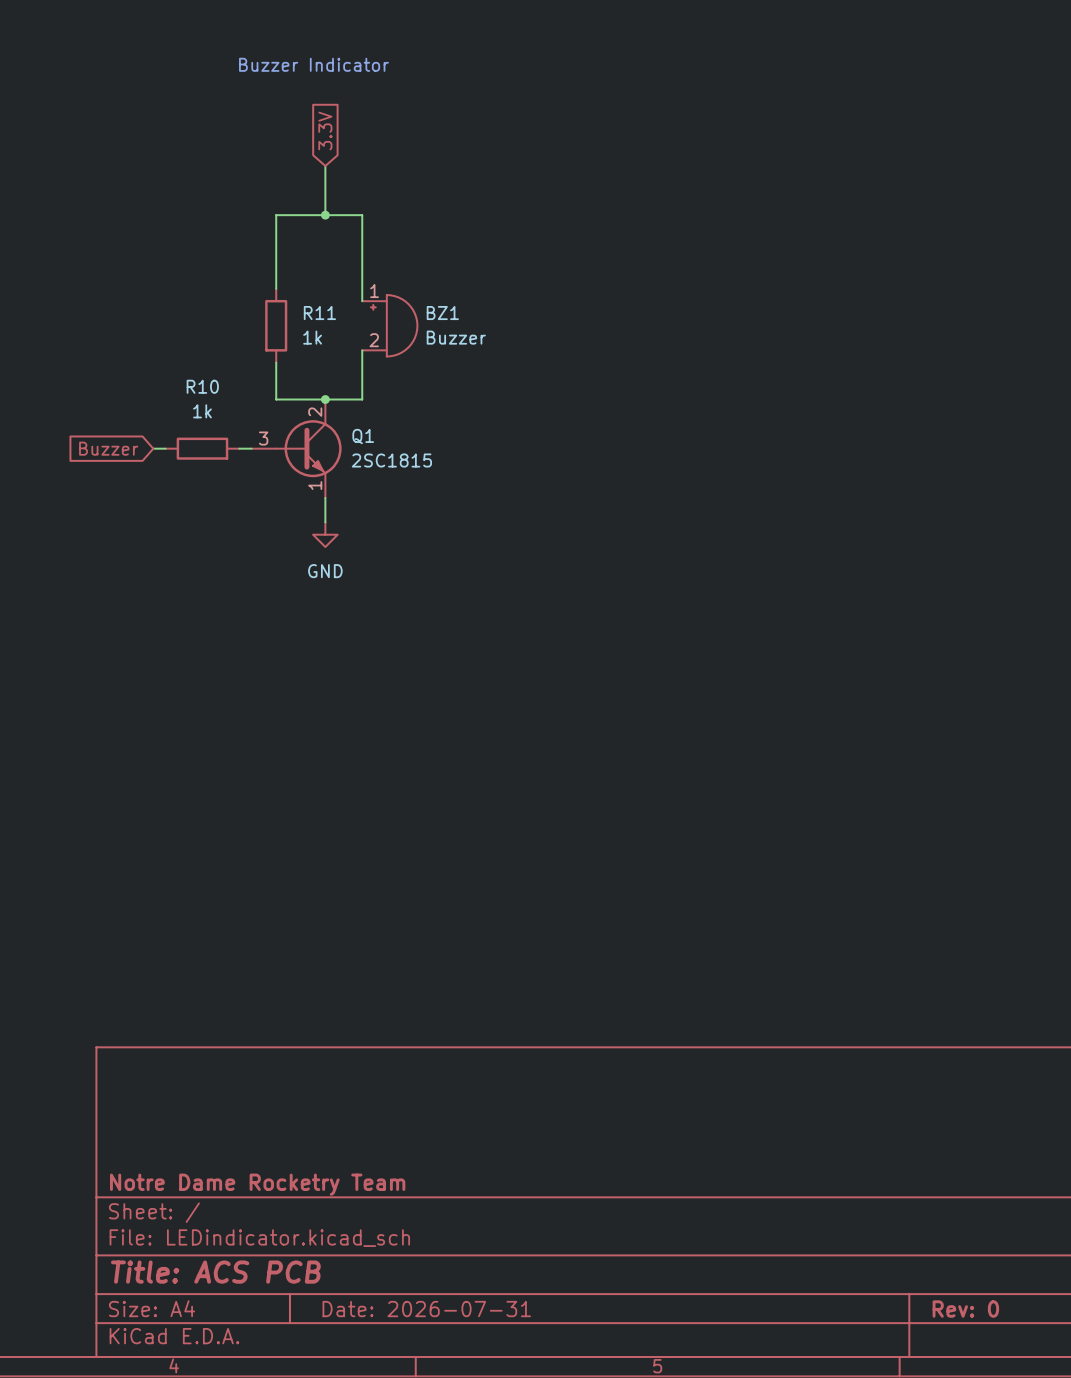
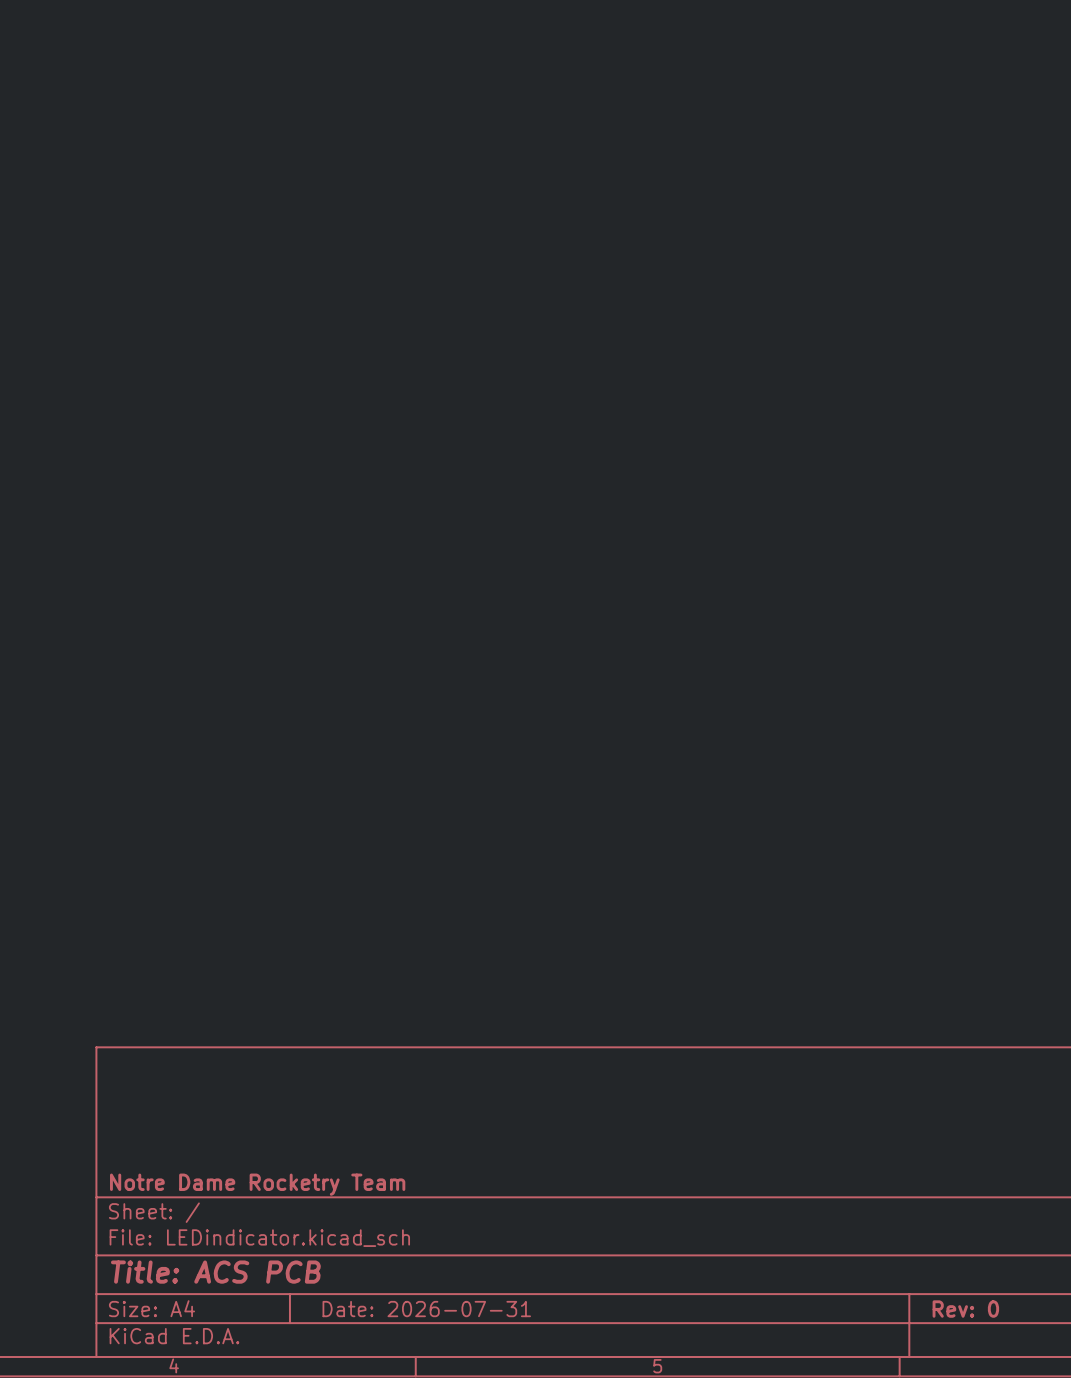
text: Buzzer Indicator (313, 64) -> none
global label: 3.3V (325, 131) -> none
wire: (325, 165) (325, 215) -> none
junction: (325, 215) -> none
wire: (276, 288) (276, 215) (362, 215) (362, 301) -> none
R11: 1k (276, 325) -> none
BZ1: Buzzer (389, 325) -> none
wire: (362, 350) (362, 399) (276, 399) (276, 362) -> none
junction: (325, 399) -> none
global label: Buzzer (108, 448) -> none
wire: (153, 448) (165, 448) -> none
R10: 1k (202, 448) -> none
wire: (239, 448) (251, 448) -> none
Q1: 2SC1815 (296, 448) -> none
wire: (325, 497) (325, 522) -> none
power symbol: GND (325, 534) -> none

